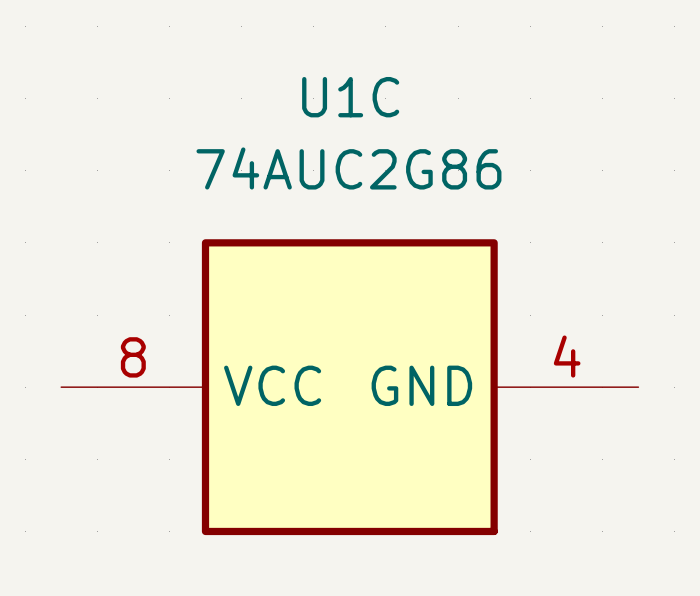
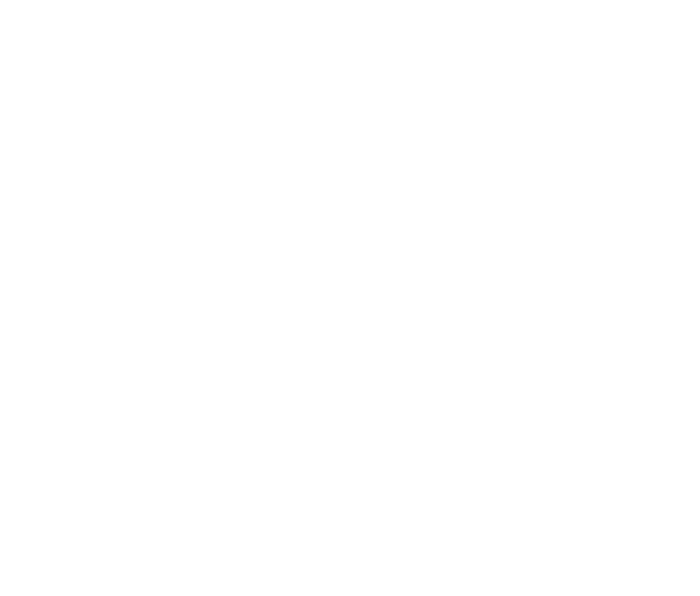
U1C: 74AUC2G86 (349, 387) -> none

